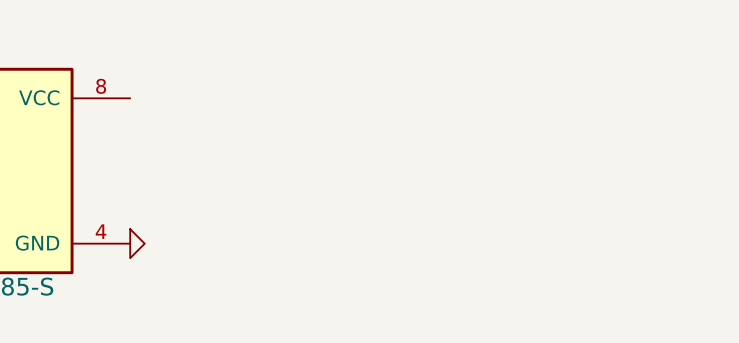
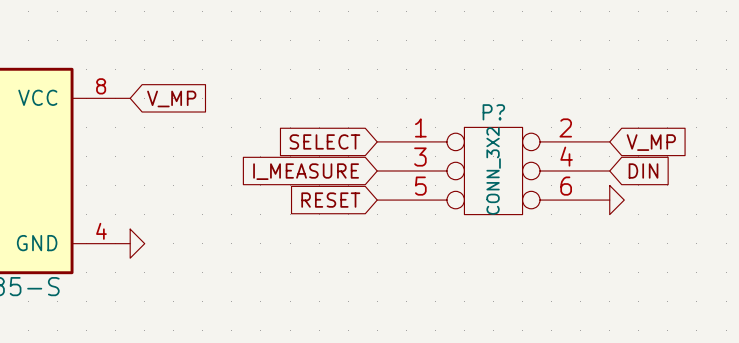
global label: none -> V_MP (171, 98)
global label: none -> SELECT (324, 141)
global label: none -> V_MP (651, 142)
P?: none -> CONN_3X2 (493, 170)
global label: none -> DIN (643, 170)
global label: none -> I_MEASURE (306, 171)
global label: none -> RESET (330, 200)
power symbol: none -> (617, 200)

